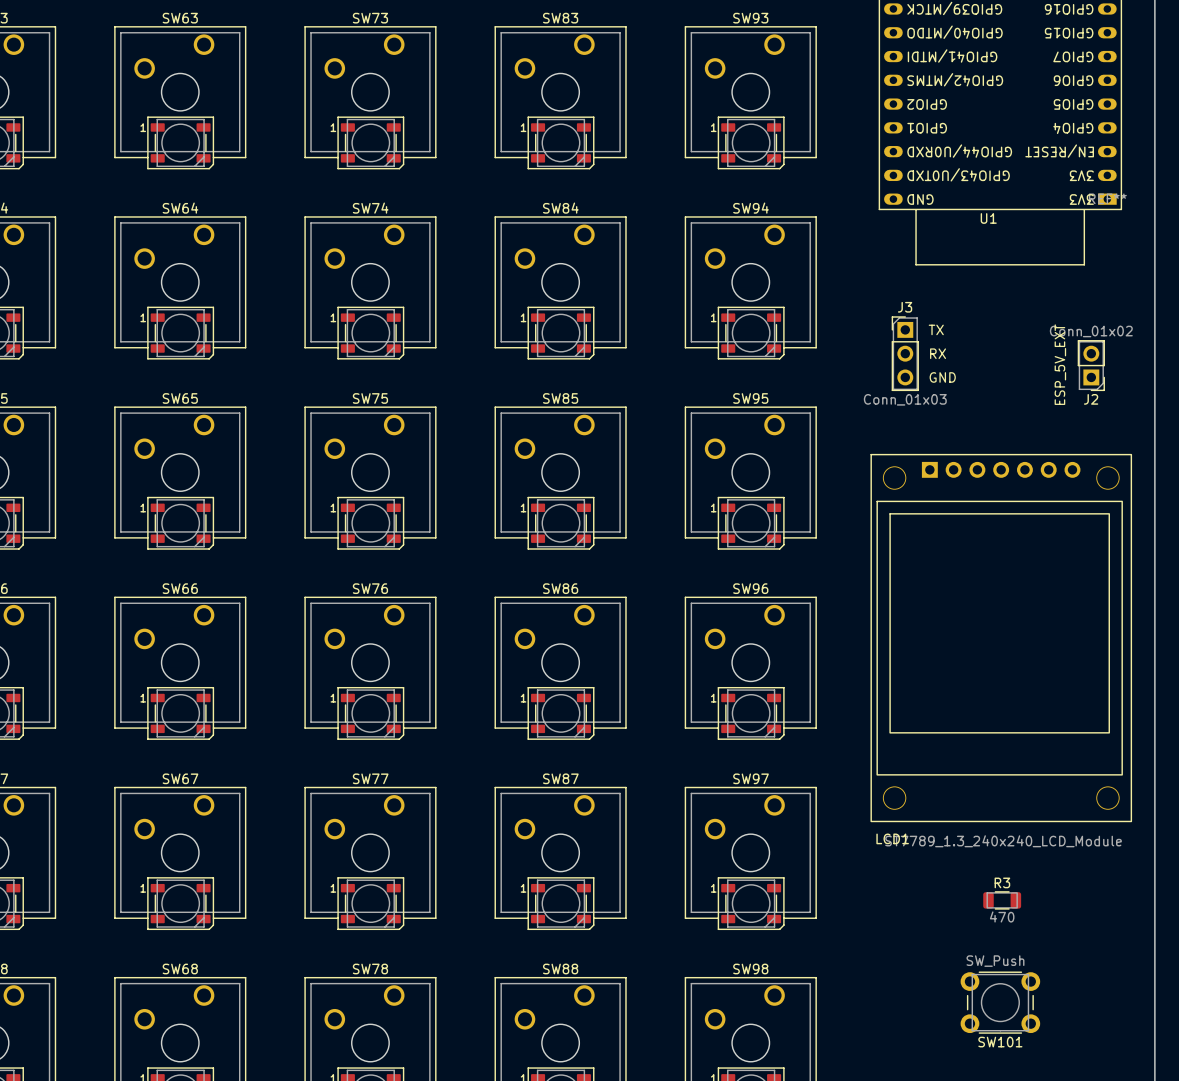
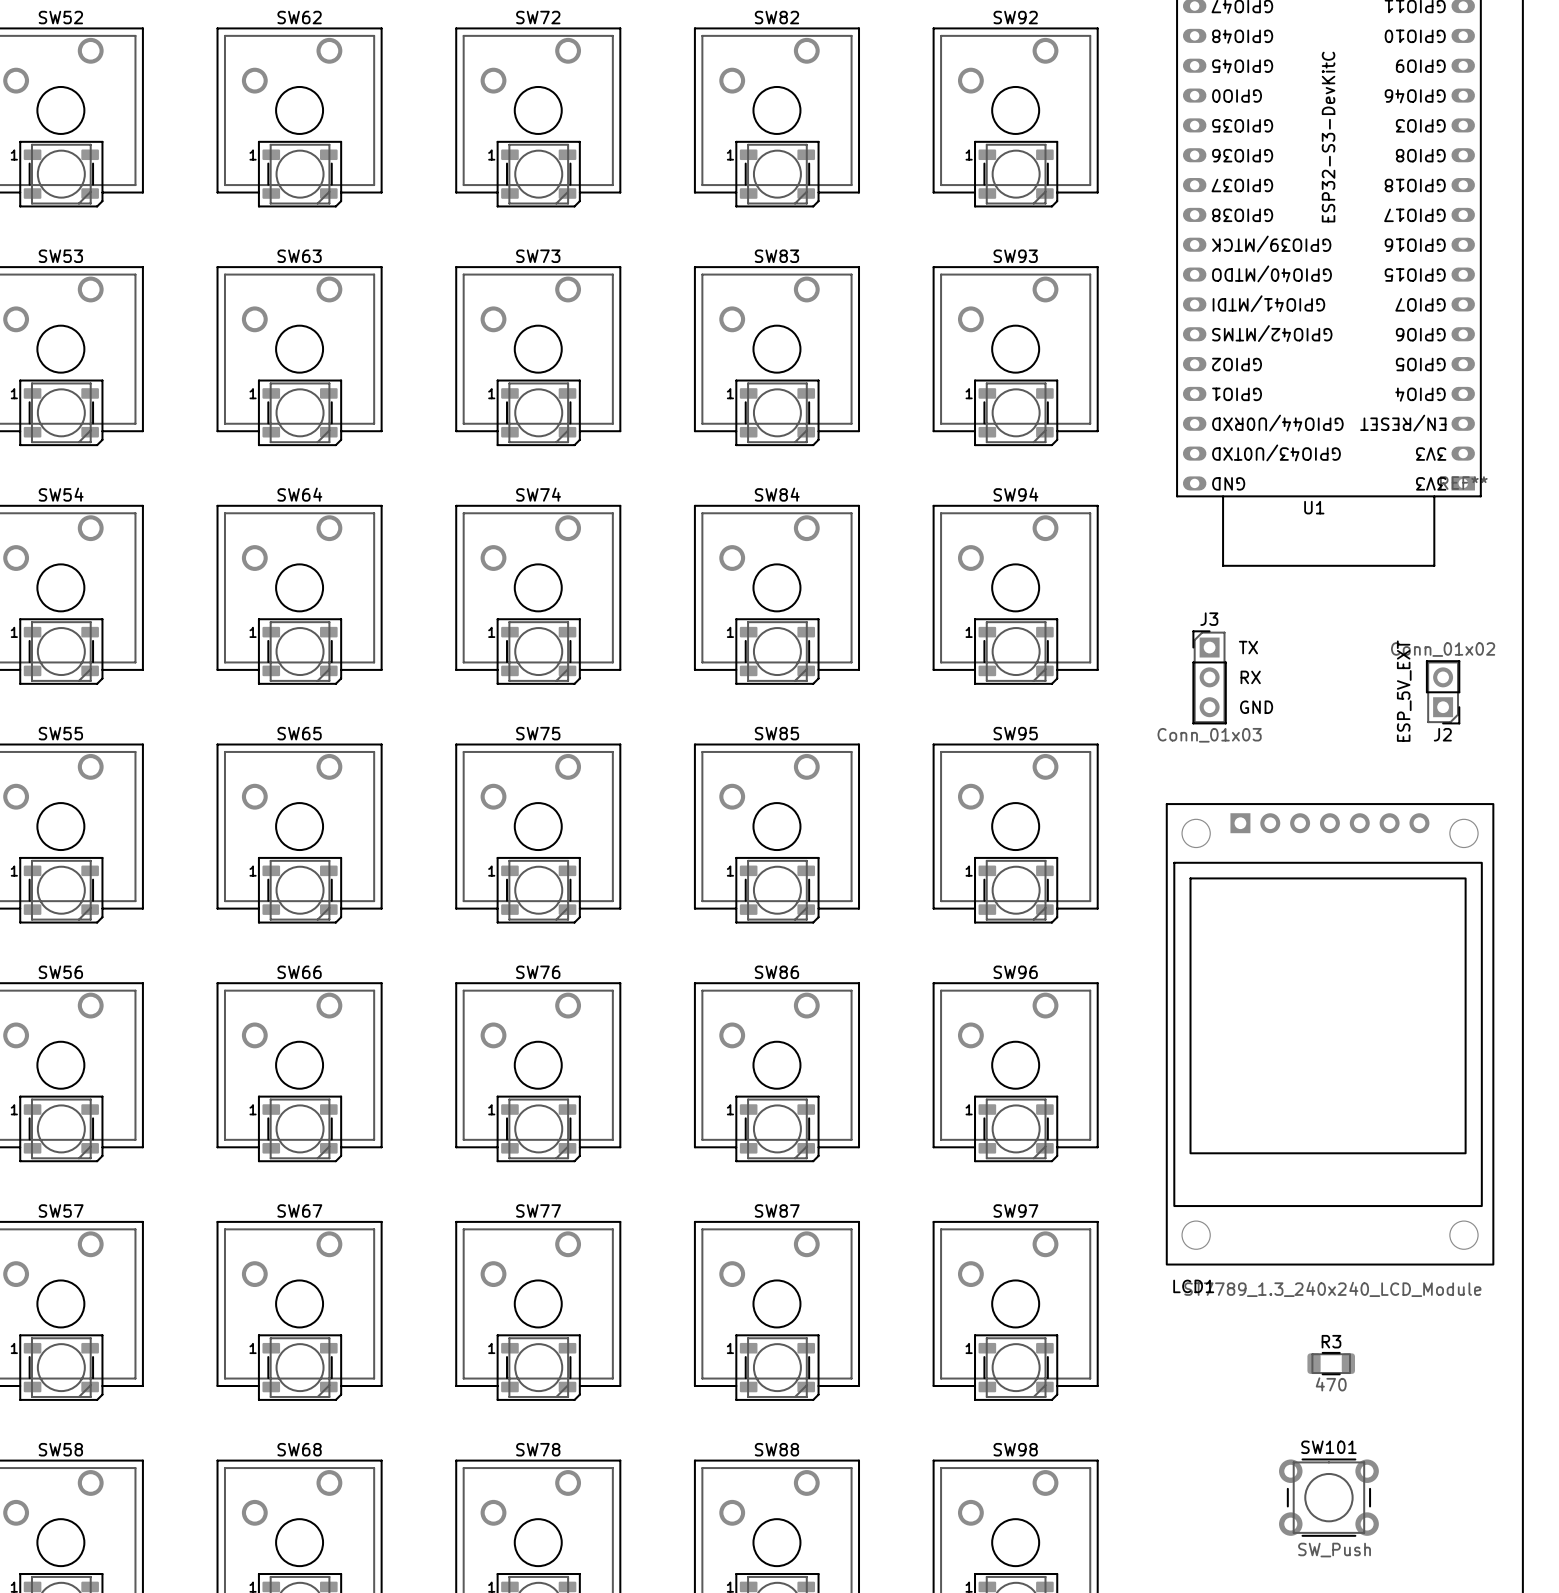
SW101 rotation: 0° (1000, 1002) -> 180° (1328, 1497)

